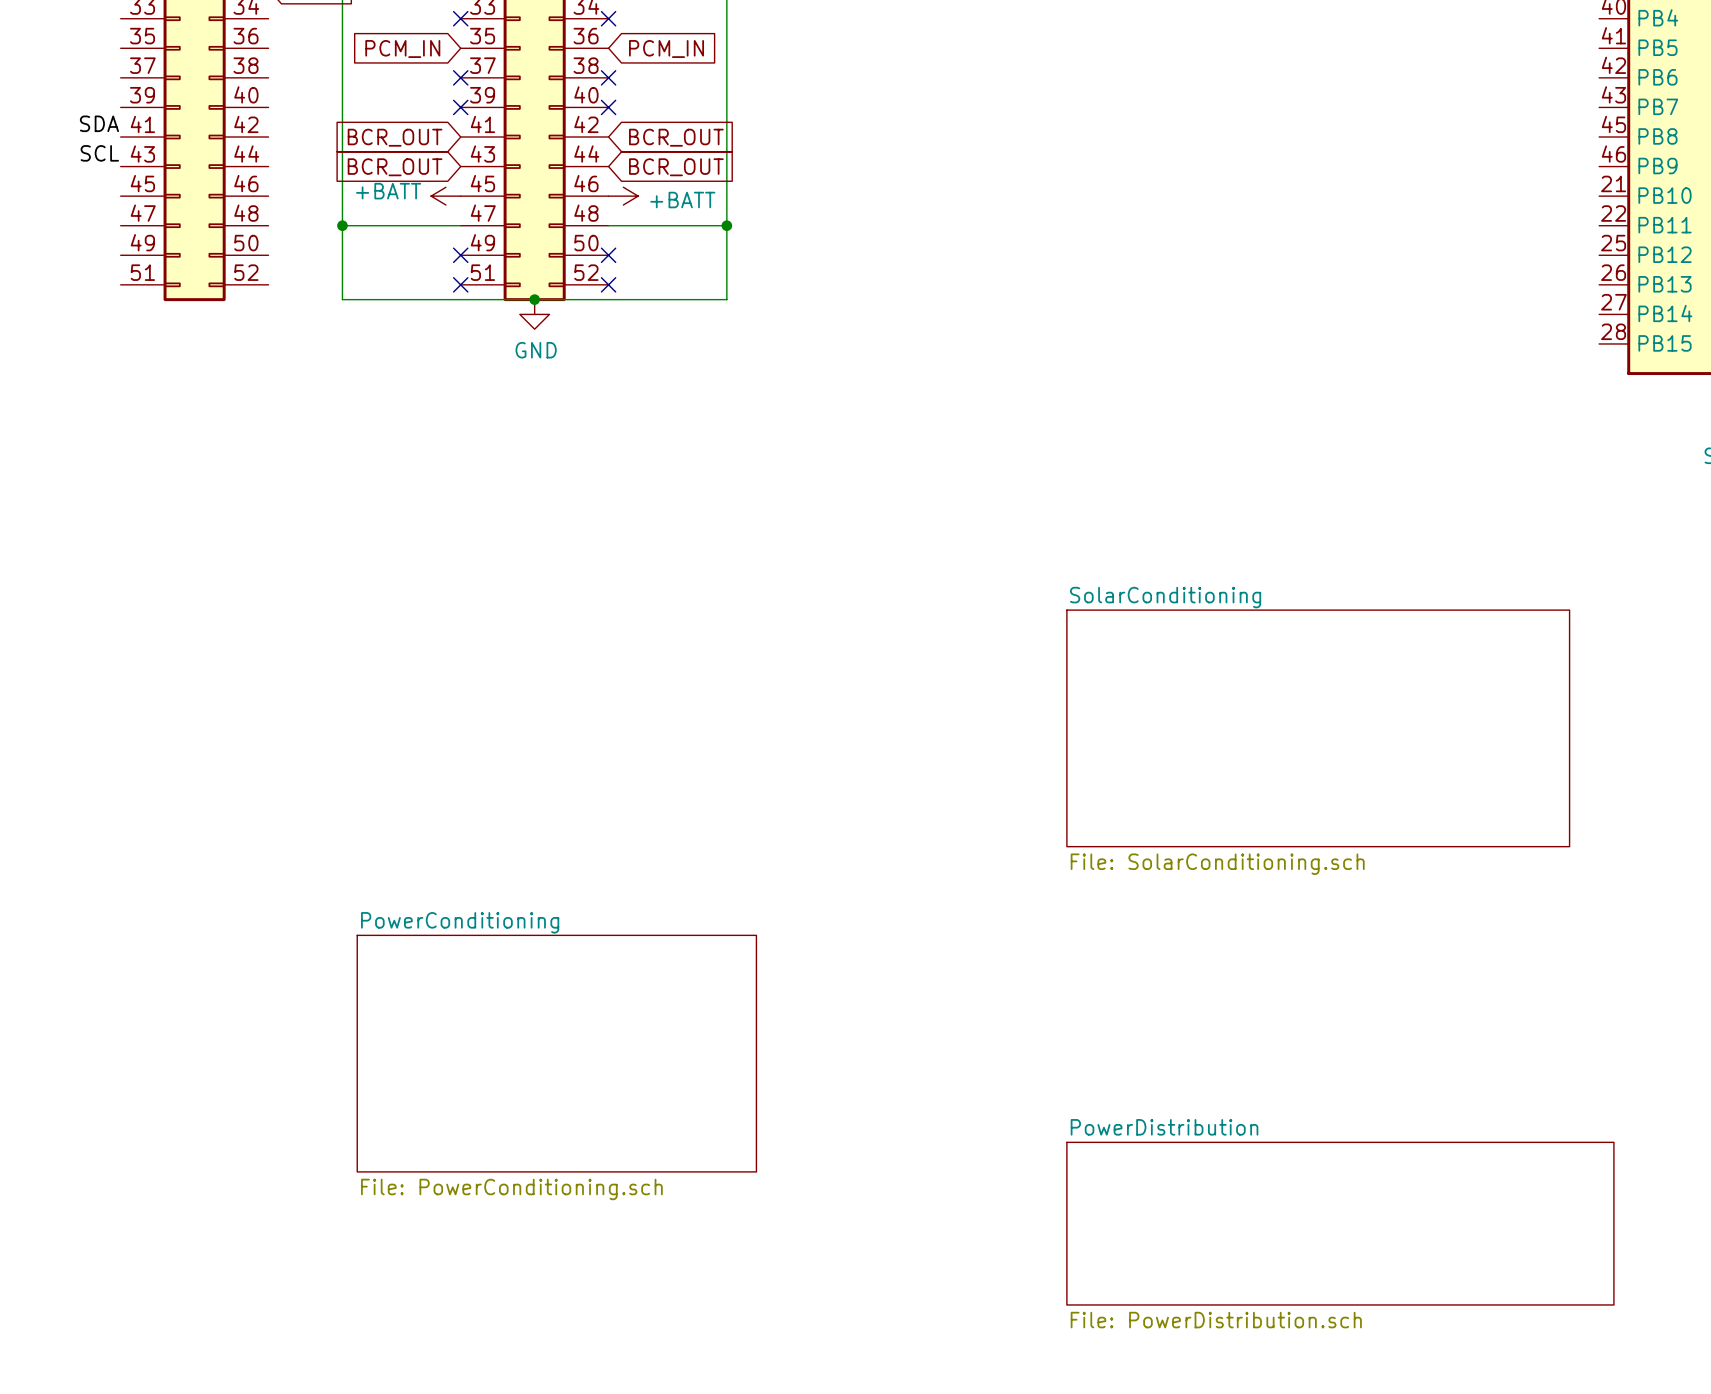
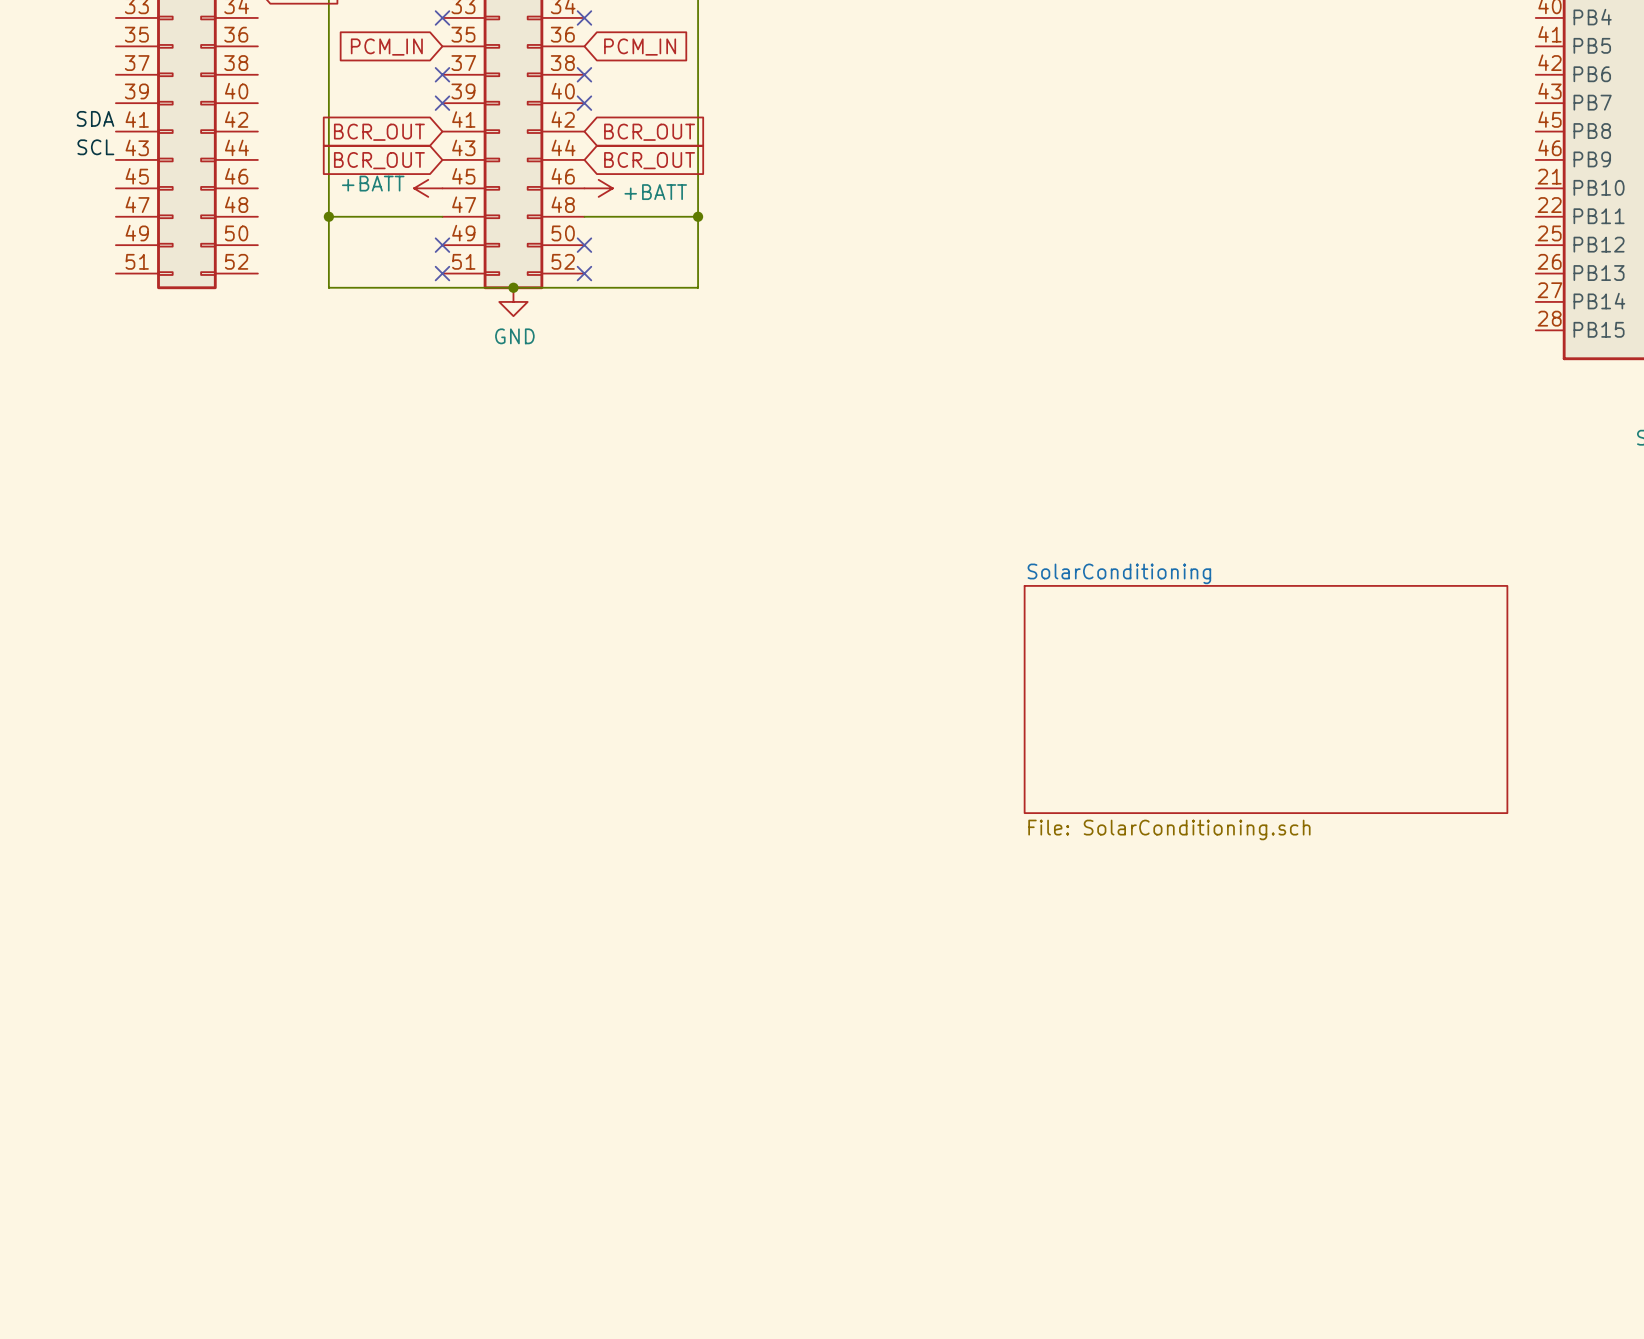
sheet PowerConditioning: File: PowerConditioning.sch (556, 1053) -> none
sheet PowerDistribution: File: PowerDistribution.sch (1340, 1223) -> none

